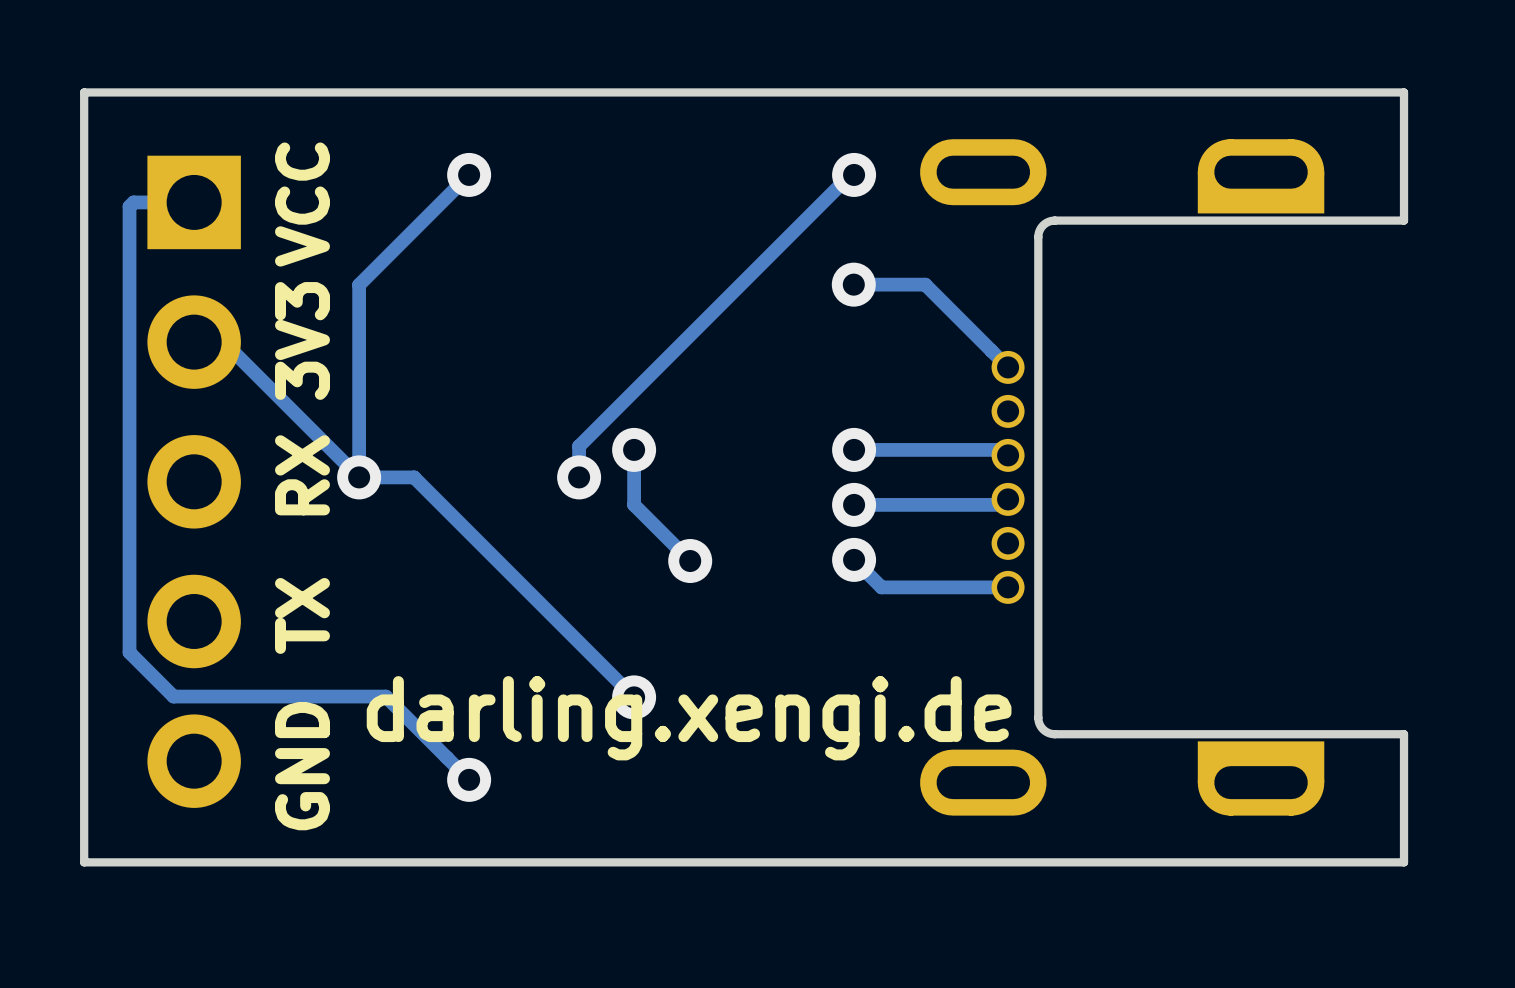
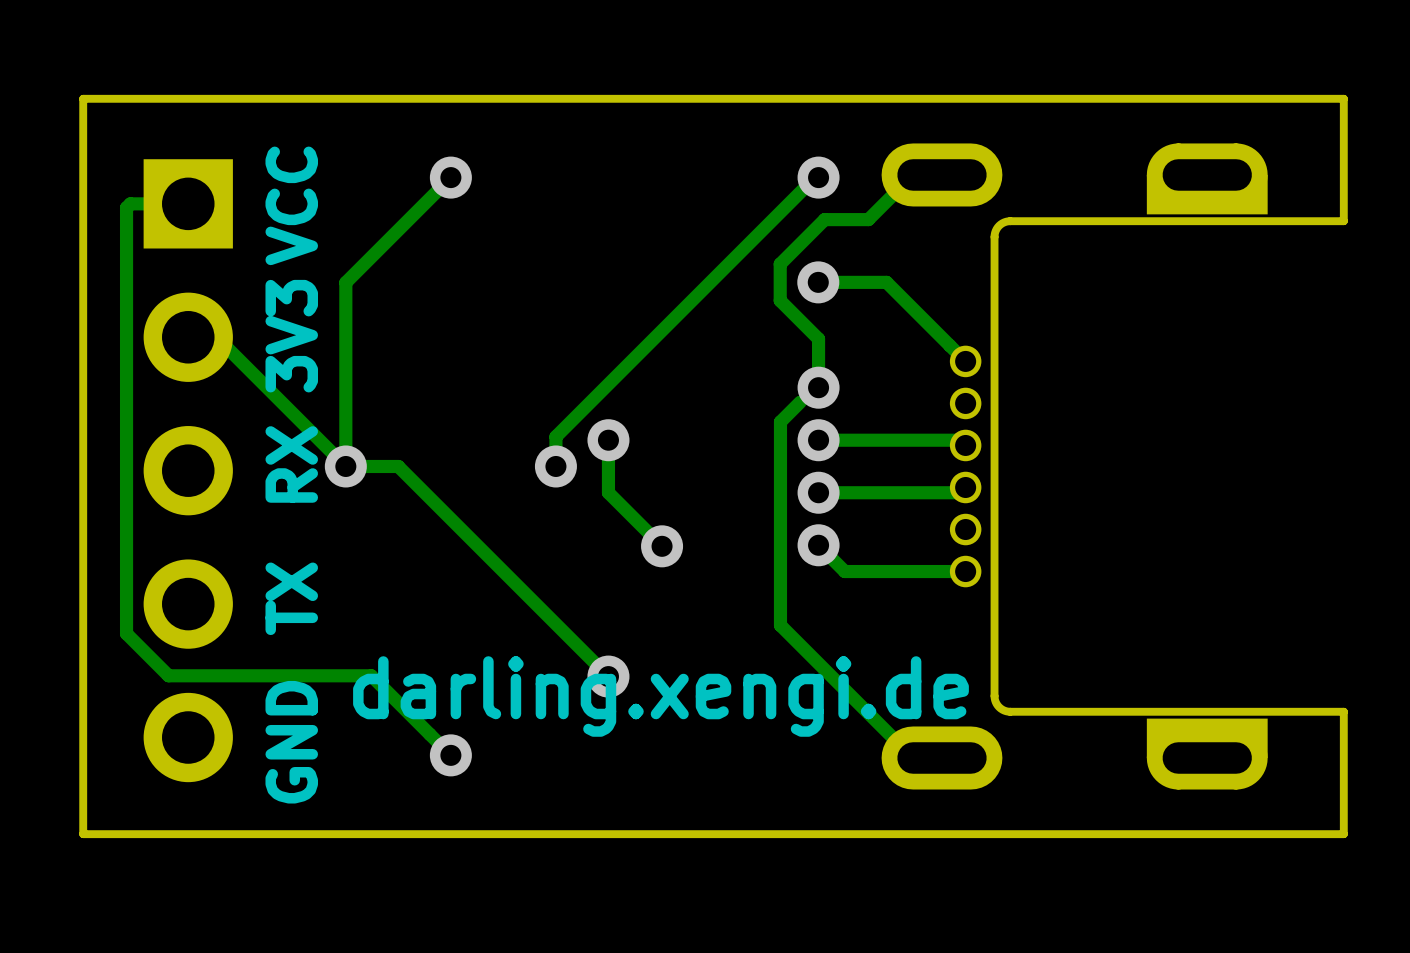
track: none -> (942, 174) (913, 174) (868, 219) (824, 219) (780, 264) (780, 300) (818, 339) (818, 387)
via: none -> (818, 387)
track: none -> (800, 402) (780, 421) (780, 625) (913, 757) (942, 757)

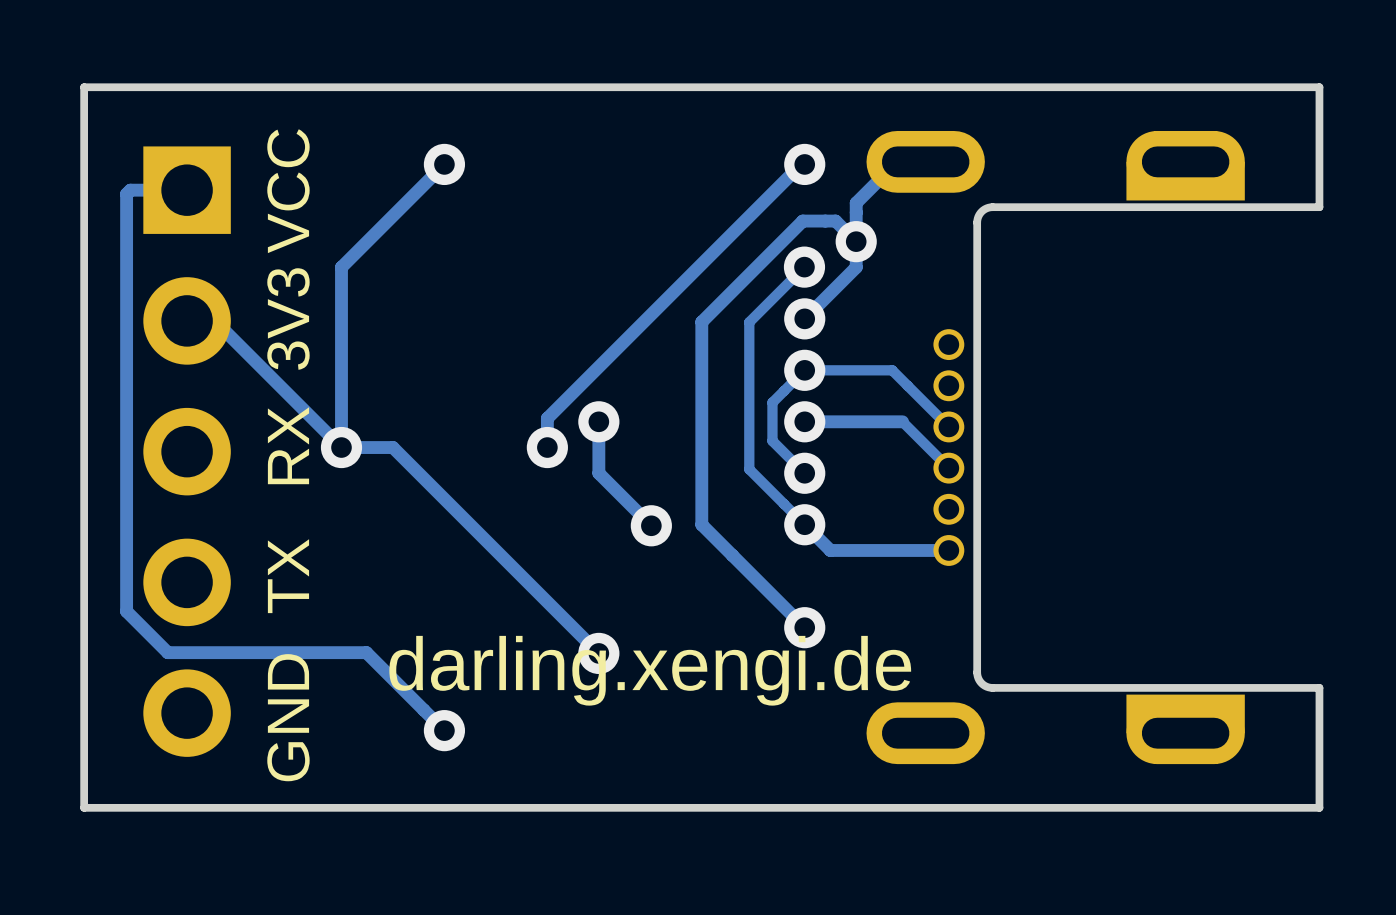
track: (871, 216) (868, 219) (824, 219) (780, 264) (780, 300) (818, 339) (818, 387) -> (856, 203) (856, 267) (804, 318) (809, 318)
track: none -> (856, 241) (835, 221) (802, 221) (701, 322) (701, 524) (804, 627)
via: none -> (856, 241)
track: (818, 282) (886, 282) (965, 361) -> (804, 267) (749, 322) (749, 469) (804, 524)
via: none -> (804, 318)
track: (800, 402) (780, 421) (780, 625) (913, 757) (942, 757) -> none
track: (960, 440) (918, 440) -> (948, 468) (902, 421)
track: (960, 492) (818, 492) -> (948, 426) (892, 370) (804, 370) (772, 402) (772, 441) (804, 473)
via: none -> (804, 627)

